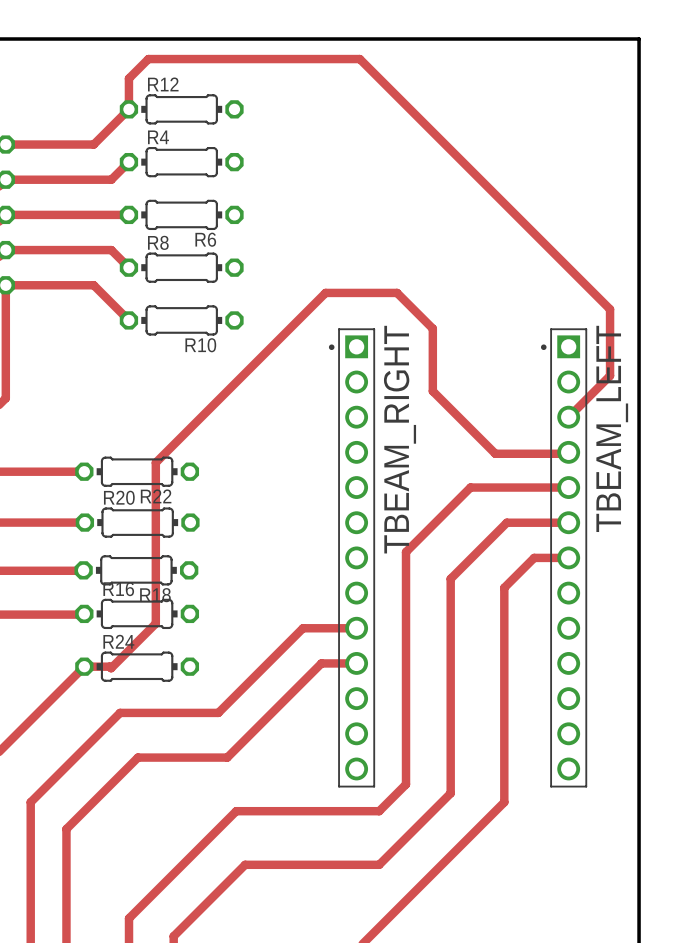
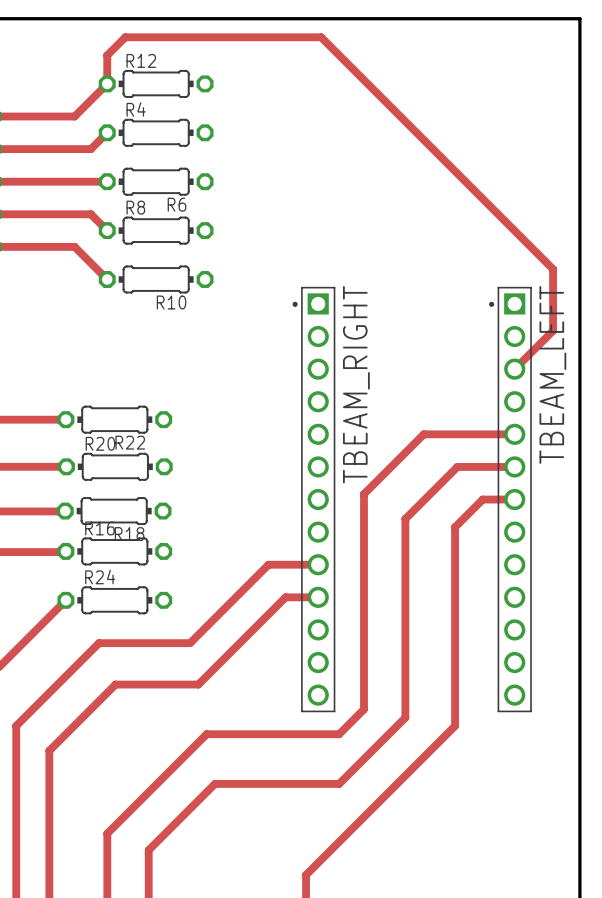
track: (568, 452) (495, 453) (432, 391) (432, 328) (397, 292) (325, 292) (155, 462) (155, 623) (111, 668) (84, 666) -> none

